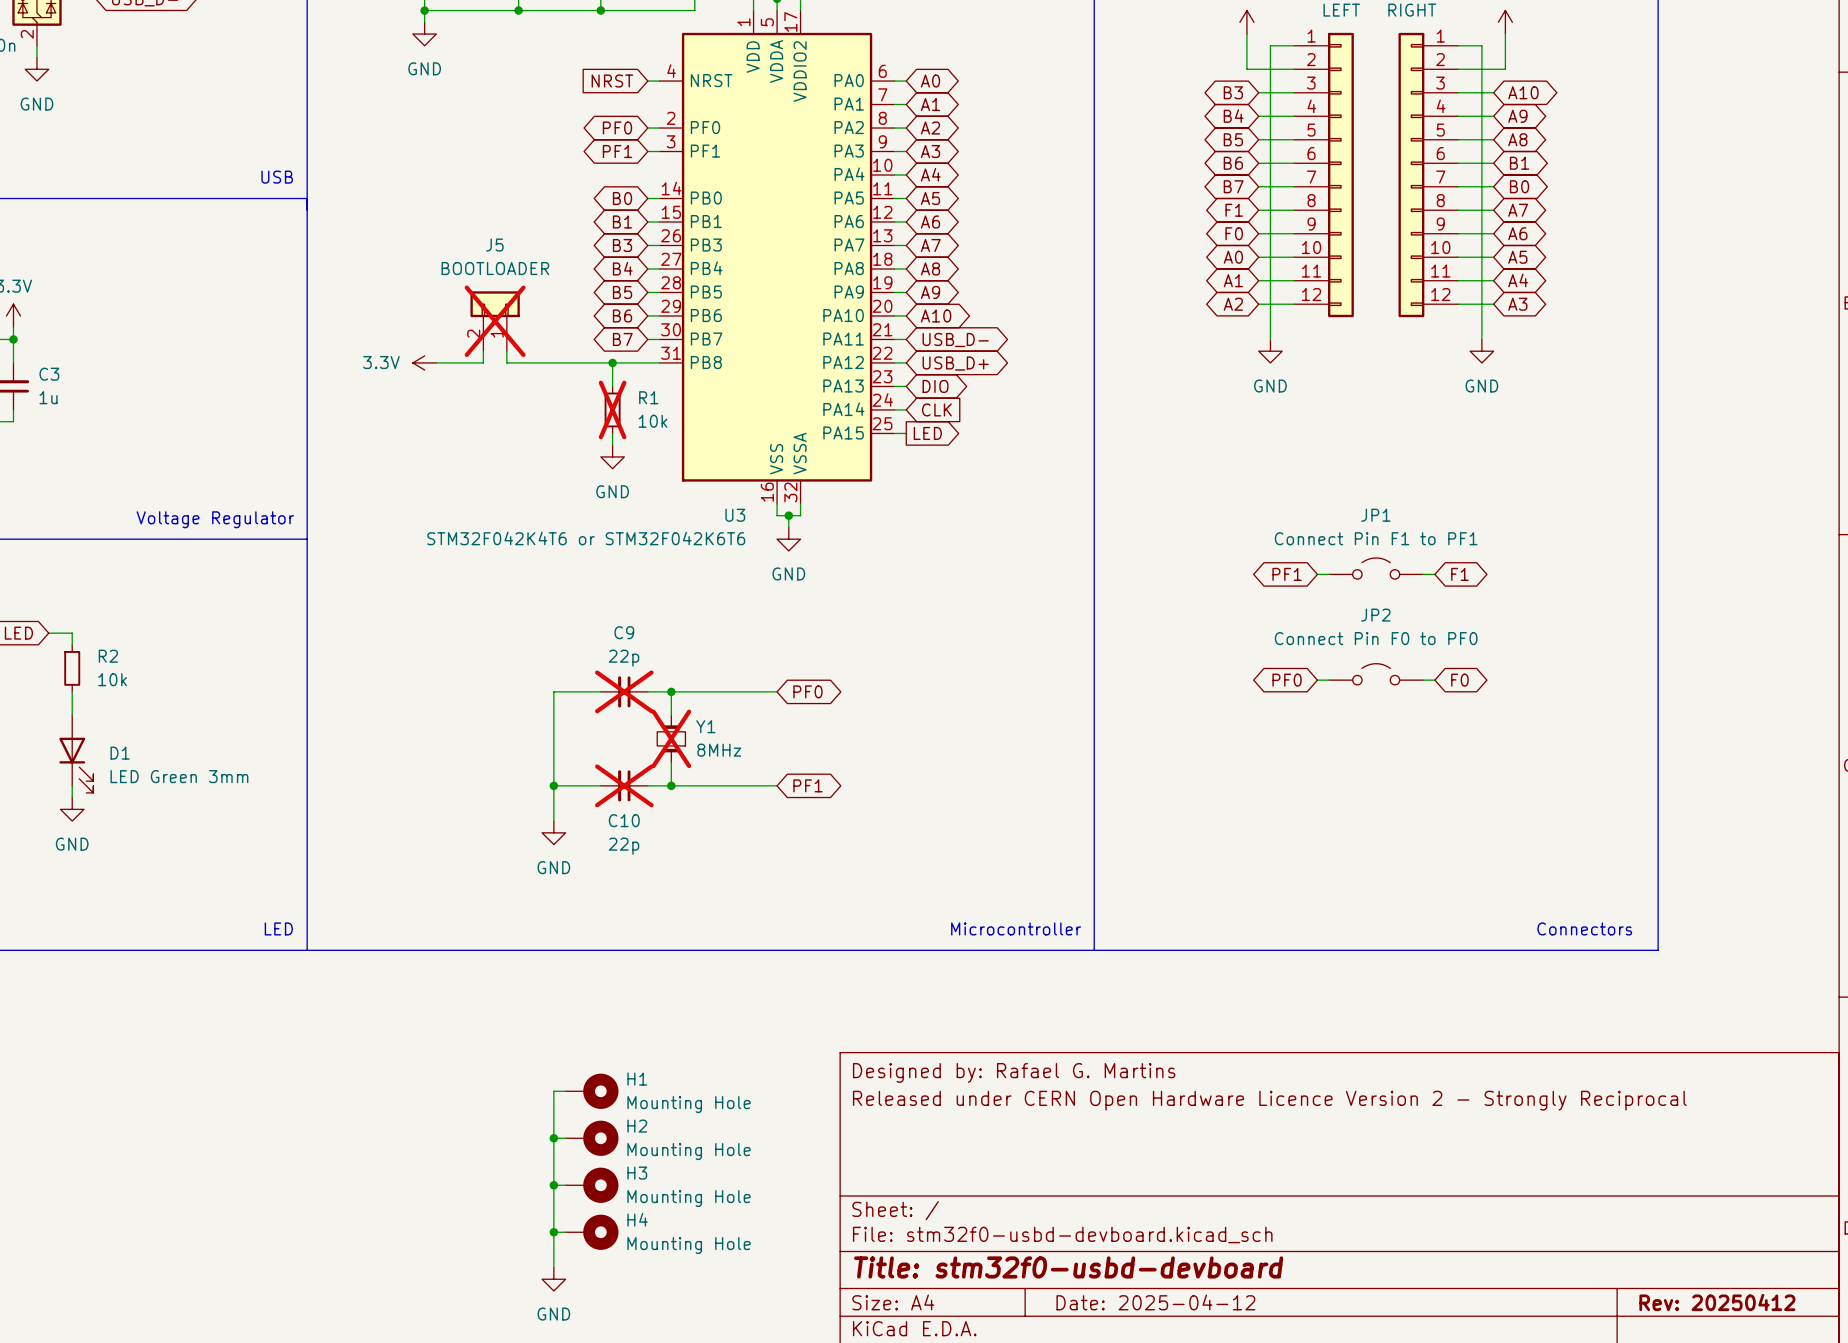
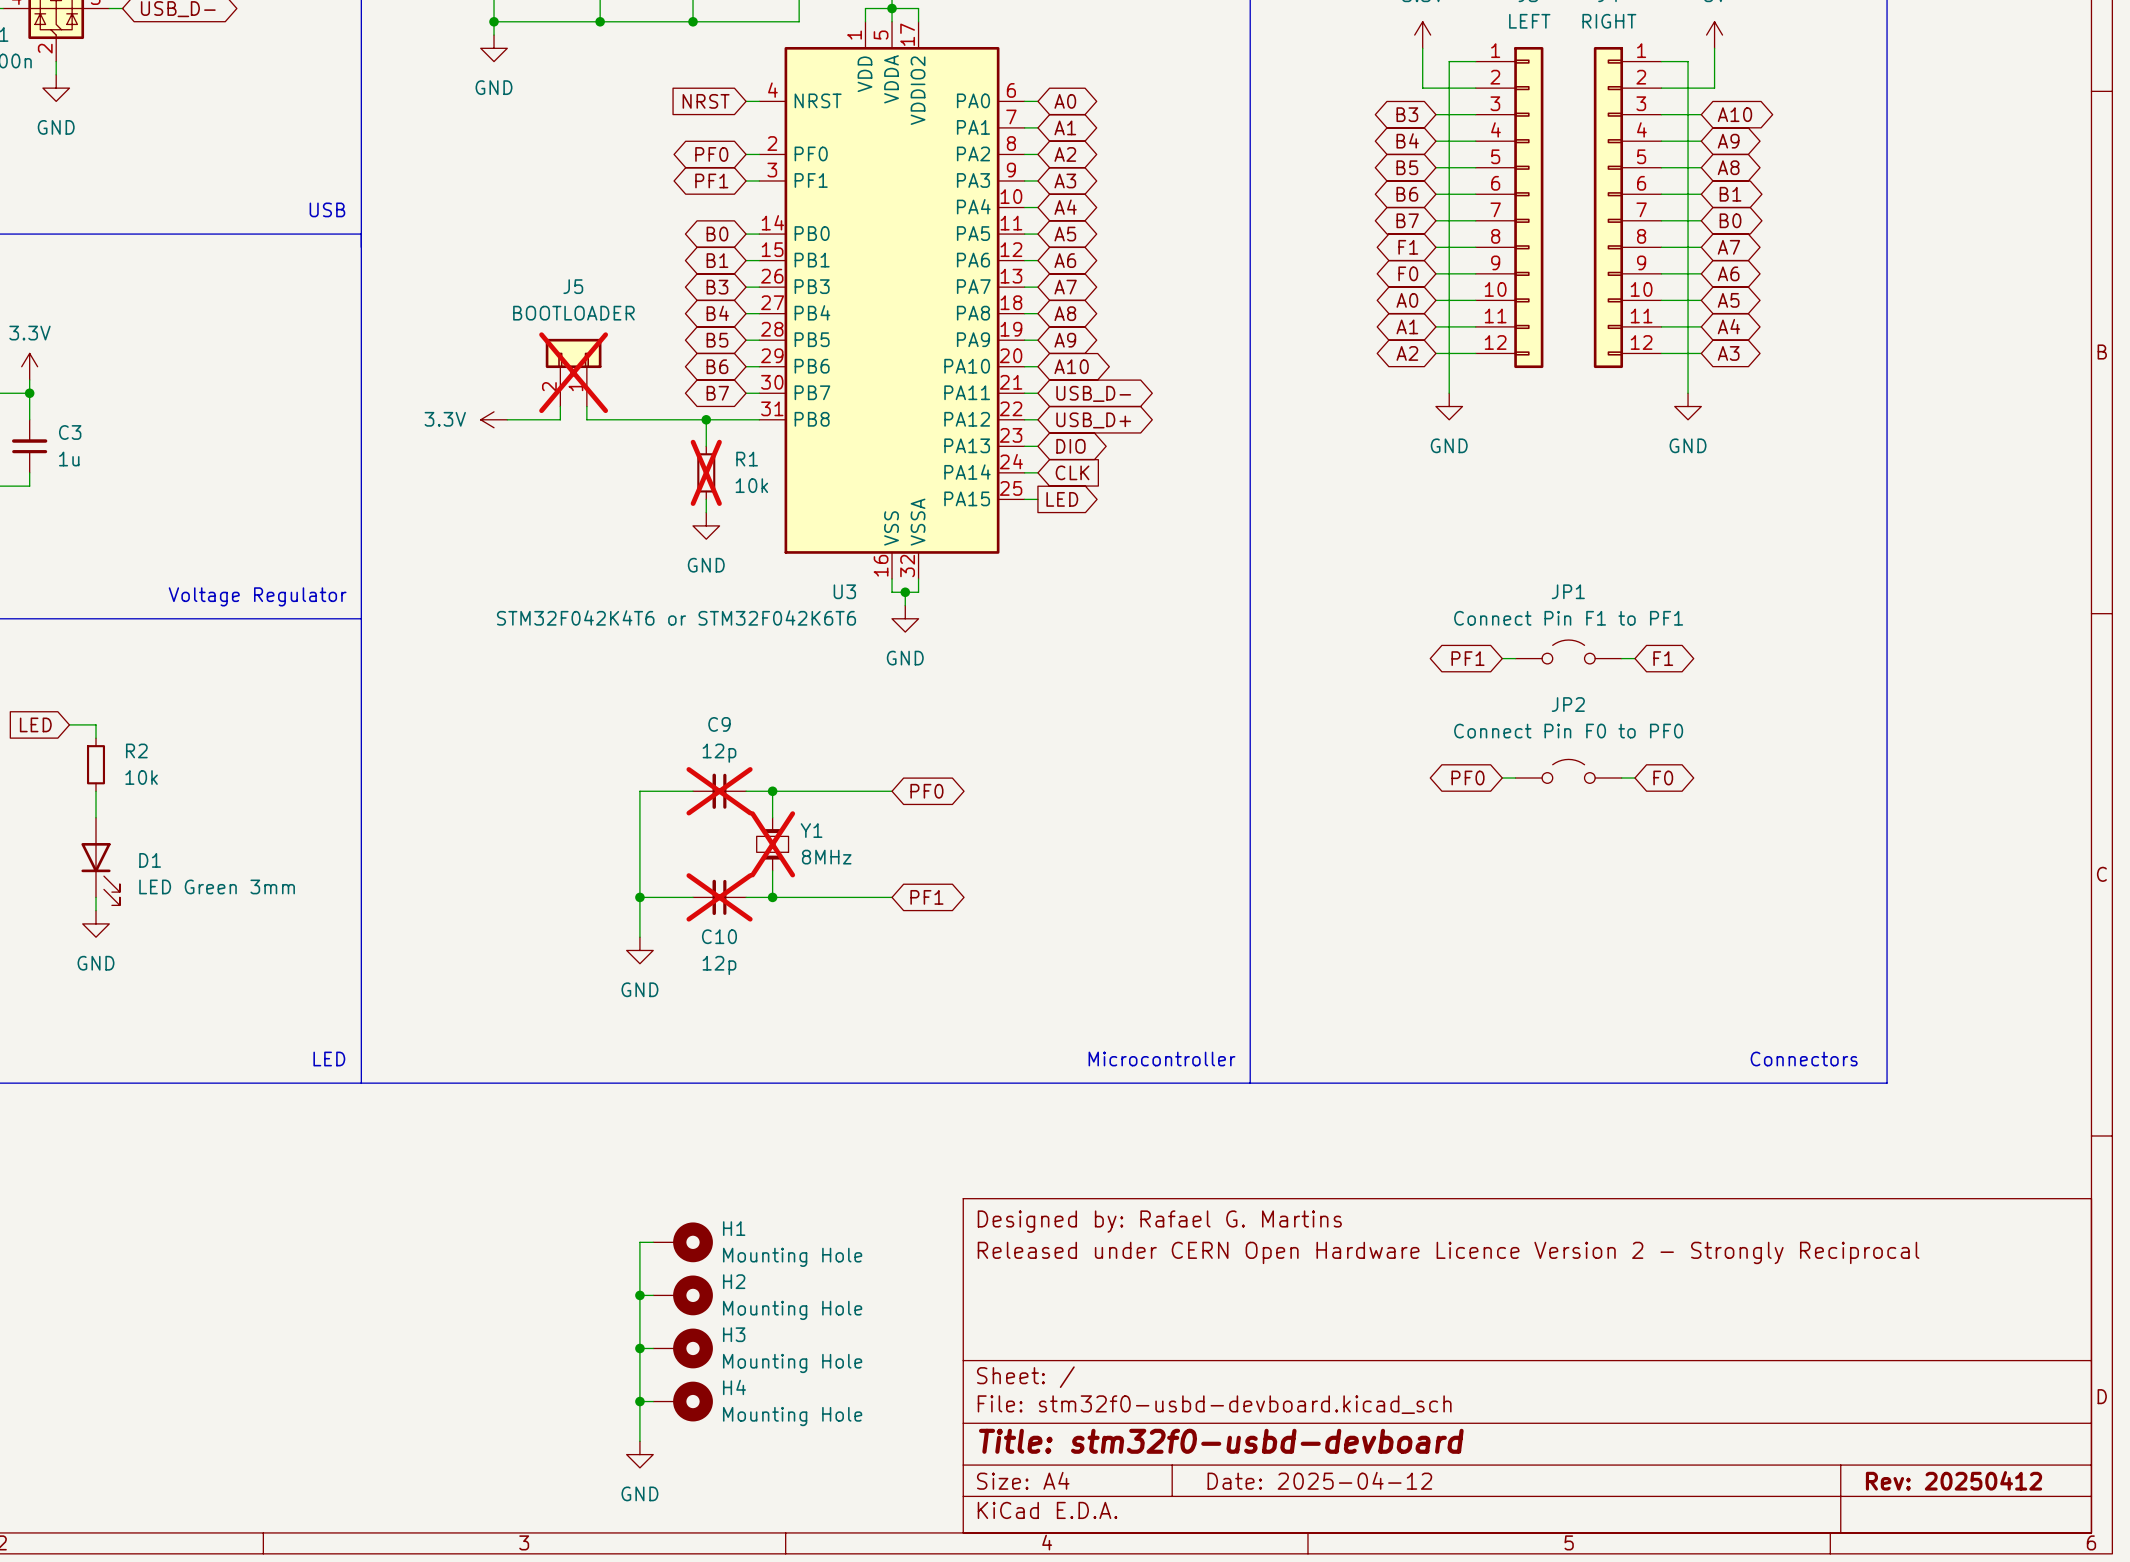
C9 value: 22p (624, 658) -> 12p (719, 753)
C10 value: 22p (624, 846) -> 12p (719, 965)

